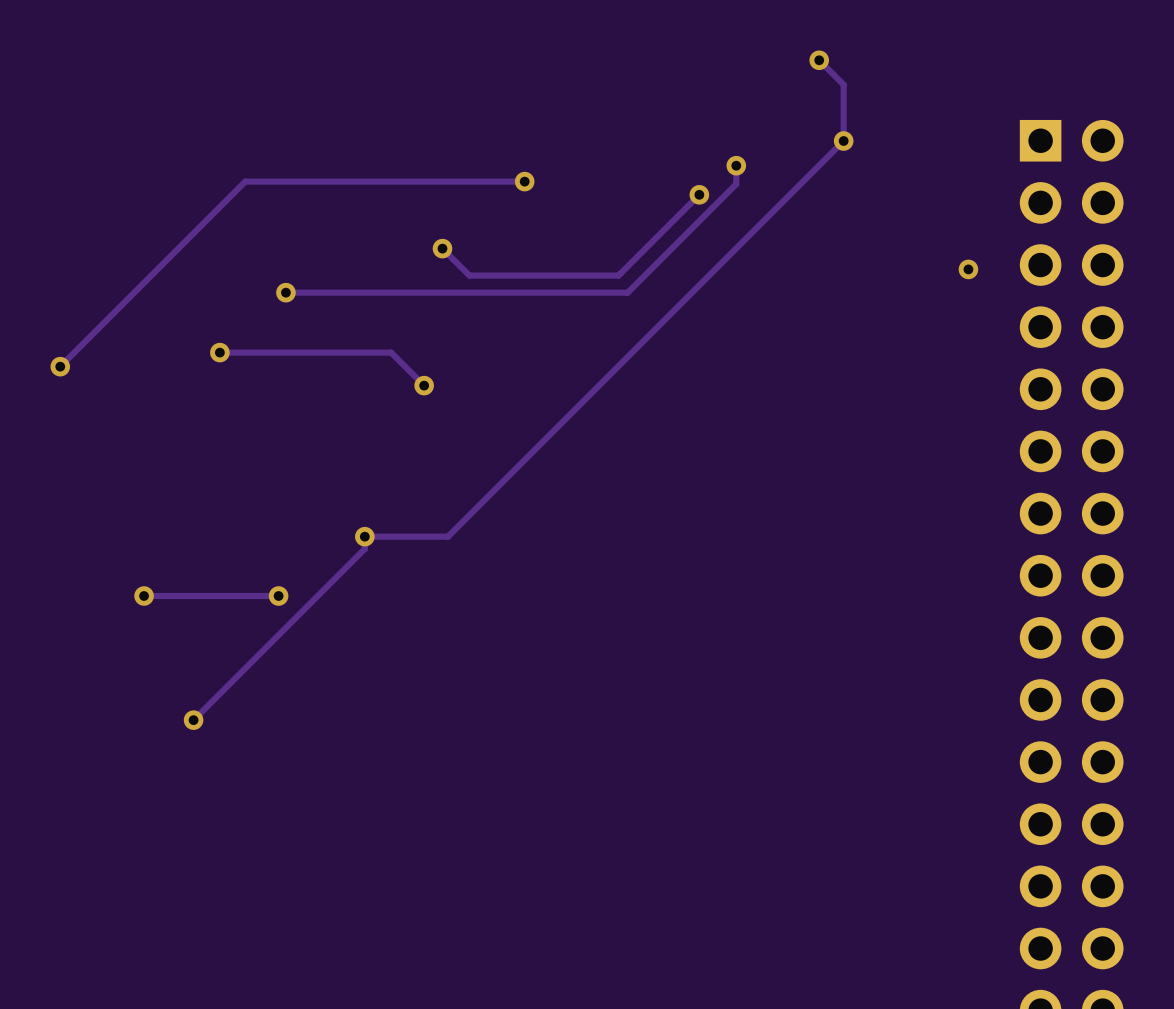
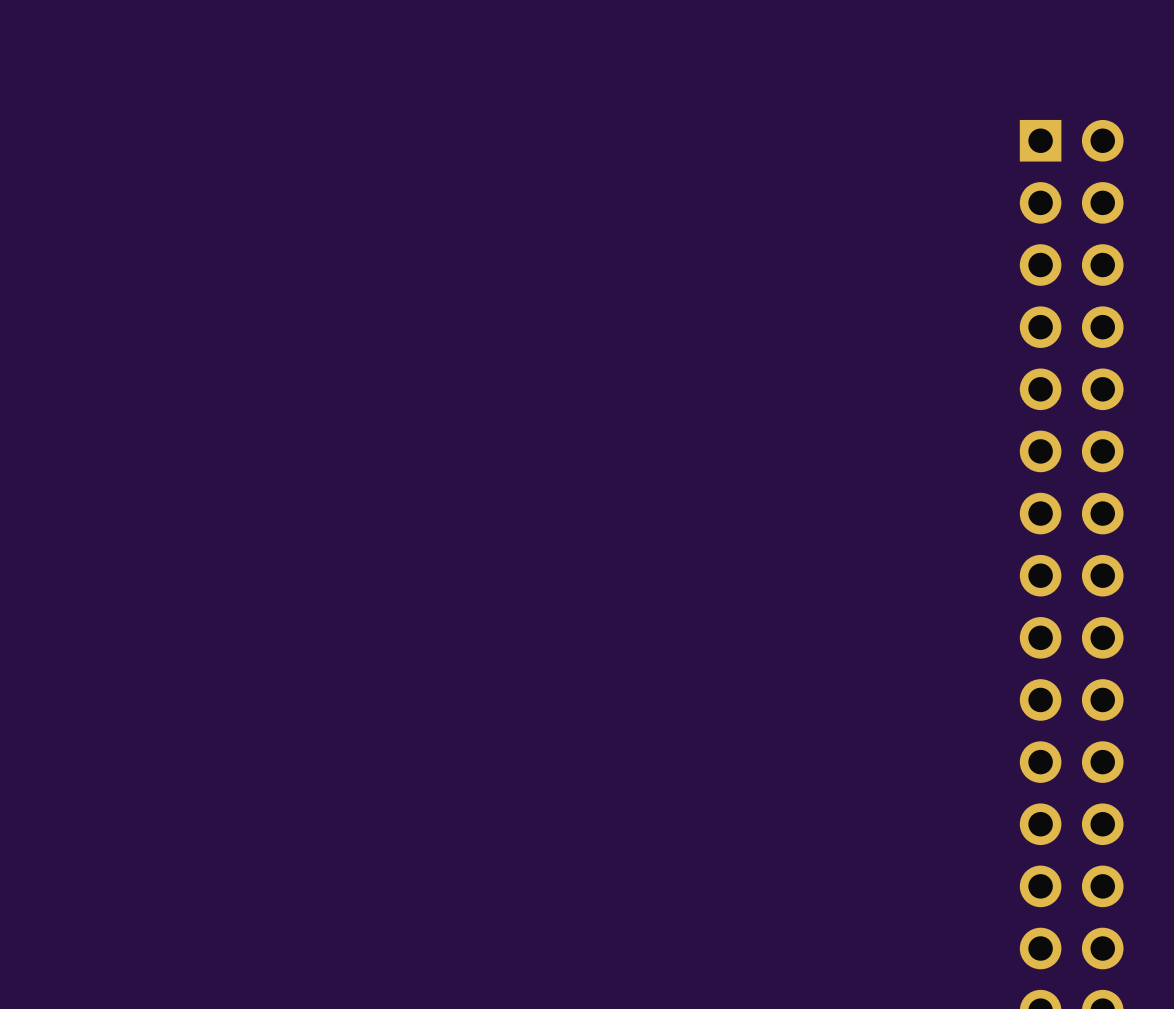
track: (819, 60) (843, 84) (843, 141) (448, 536) (364, 536) (364, 548) (193, 720) -> none
via: (819, 60) -> none
via: (843, 141) -> none
track: (736, 165) (736, 184) (627, 292) (285, 292) -> none
via: (736, 165) -> none
track: (524, 181) (245, 181) (60, 366) -> none
via: (524, 181) -> none
track: (699, 194) (618, 275) (469, 275) (442, 248) -> none
via: (699, 194) -> none
via: (442, 248) -> none
via: (968, 269) -> none
via: (285, 292) -> none
track: (219, 352) (391, 352) (424, 385) -> none
via: (219, 352) -> none
via: (60, 366) -> none
via: (424, 385) -> none
via: (364, 536) -> none
via: (144, 596) -> none
track: (278, 596) (144, 596) -> none
via: (278, 596) -> none
via: (193, 720) -> none

